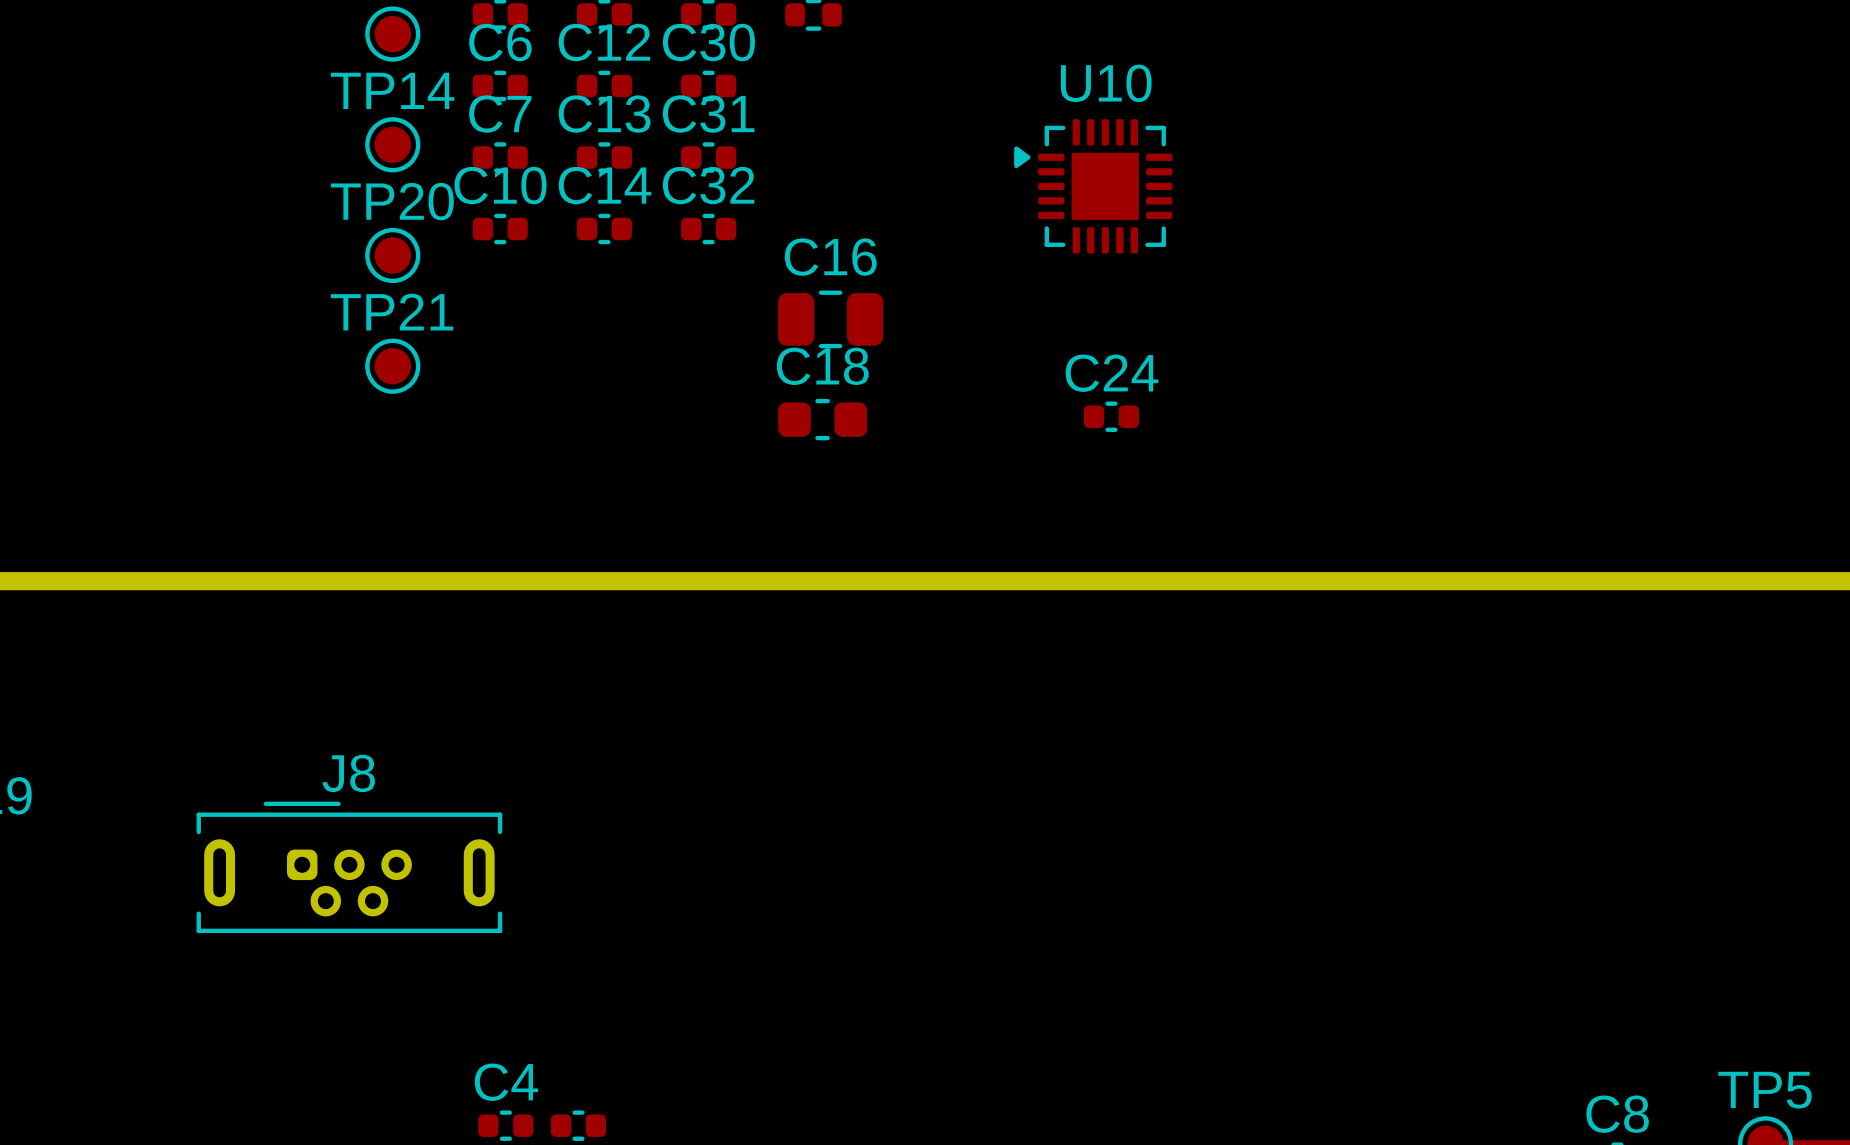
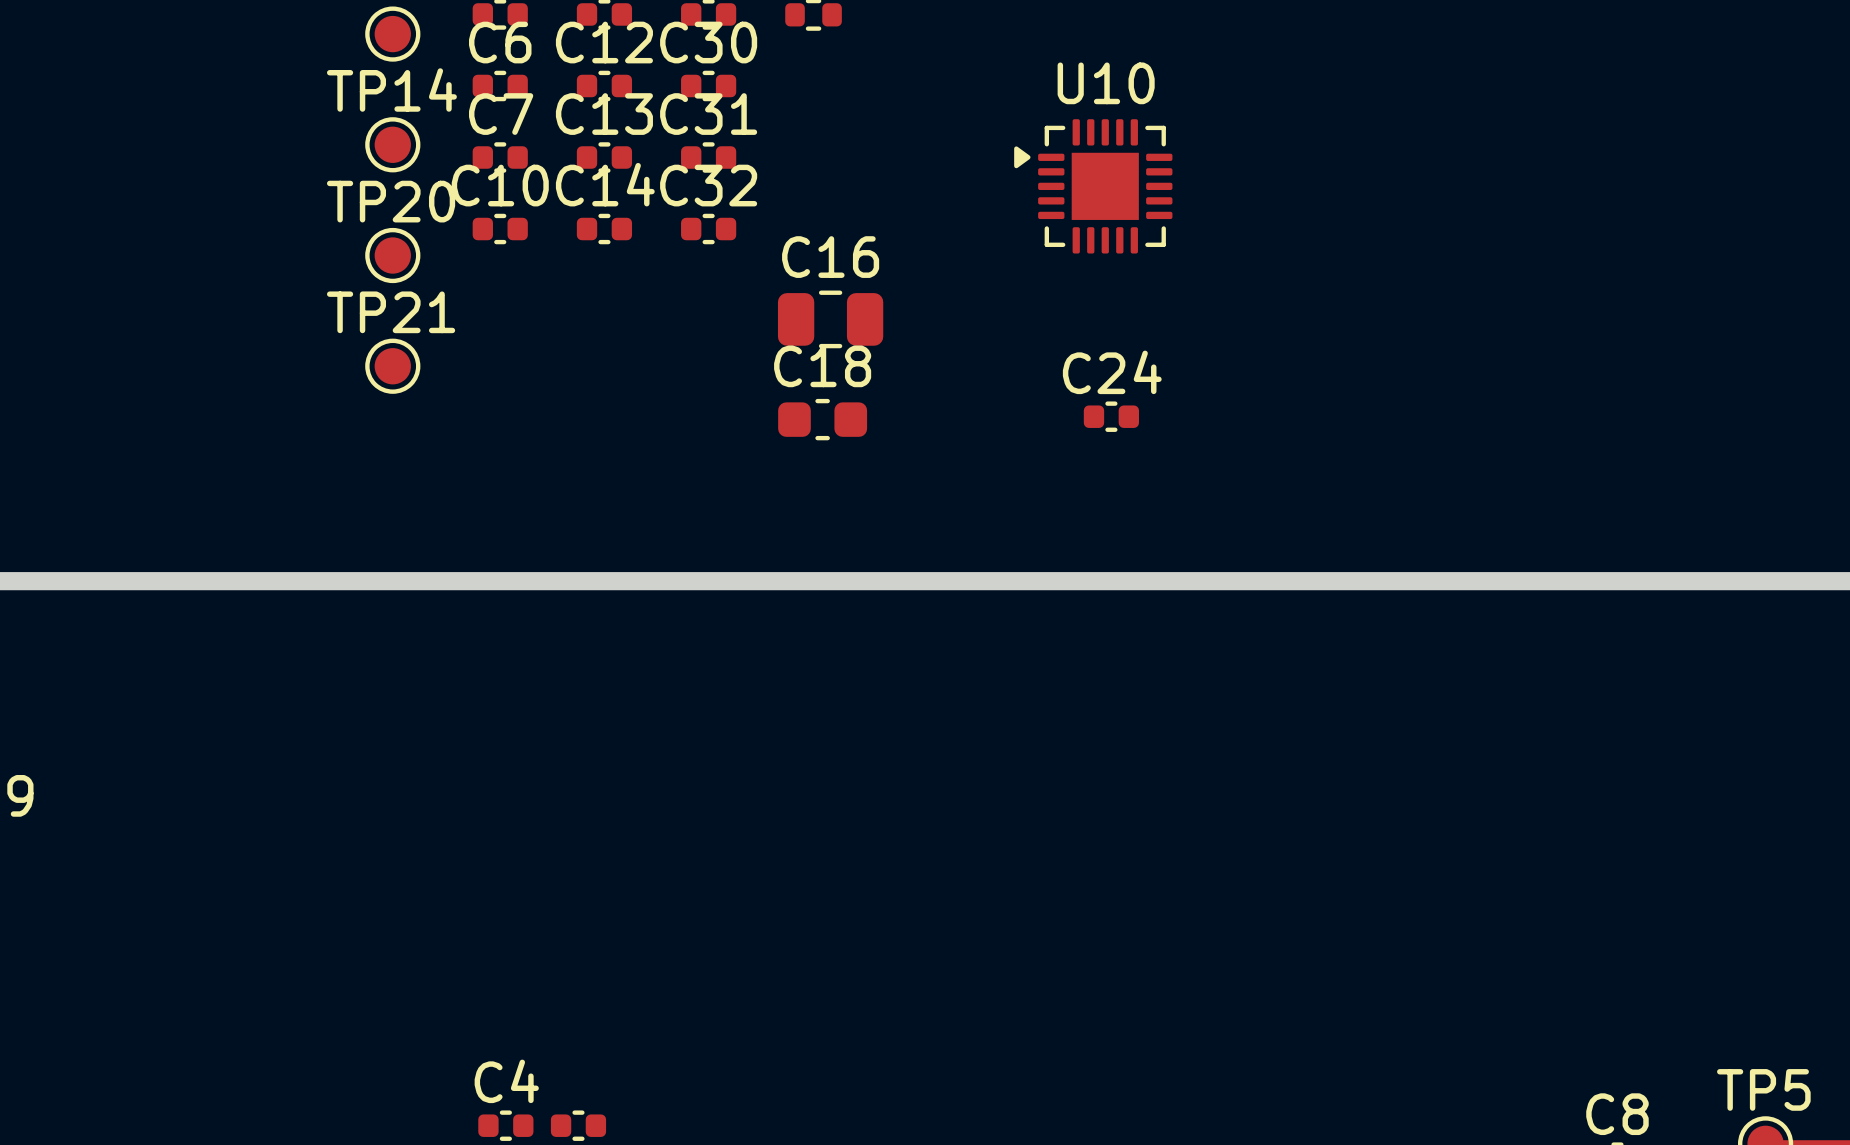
J8: (349, 867) -> none

